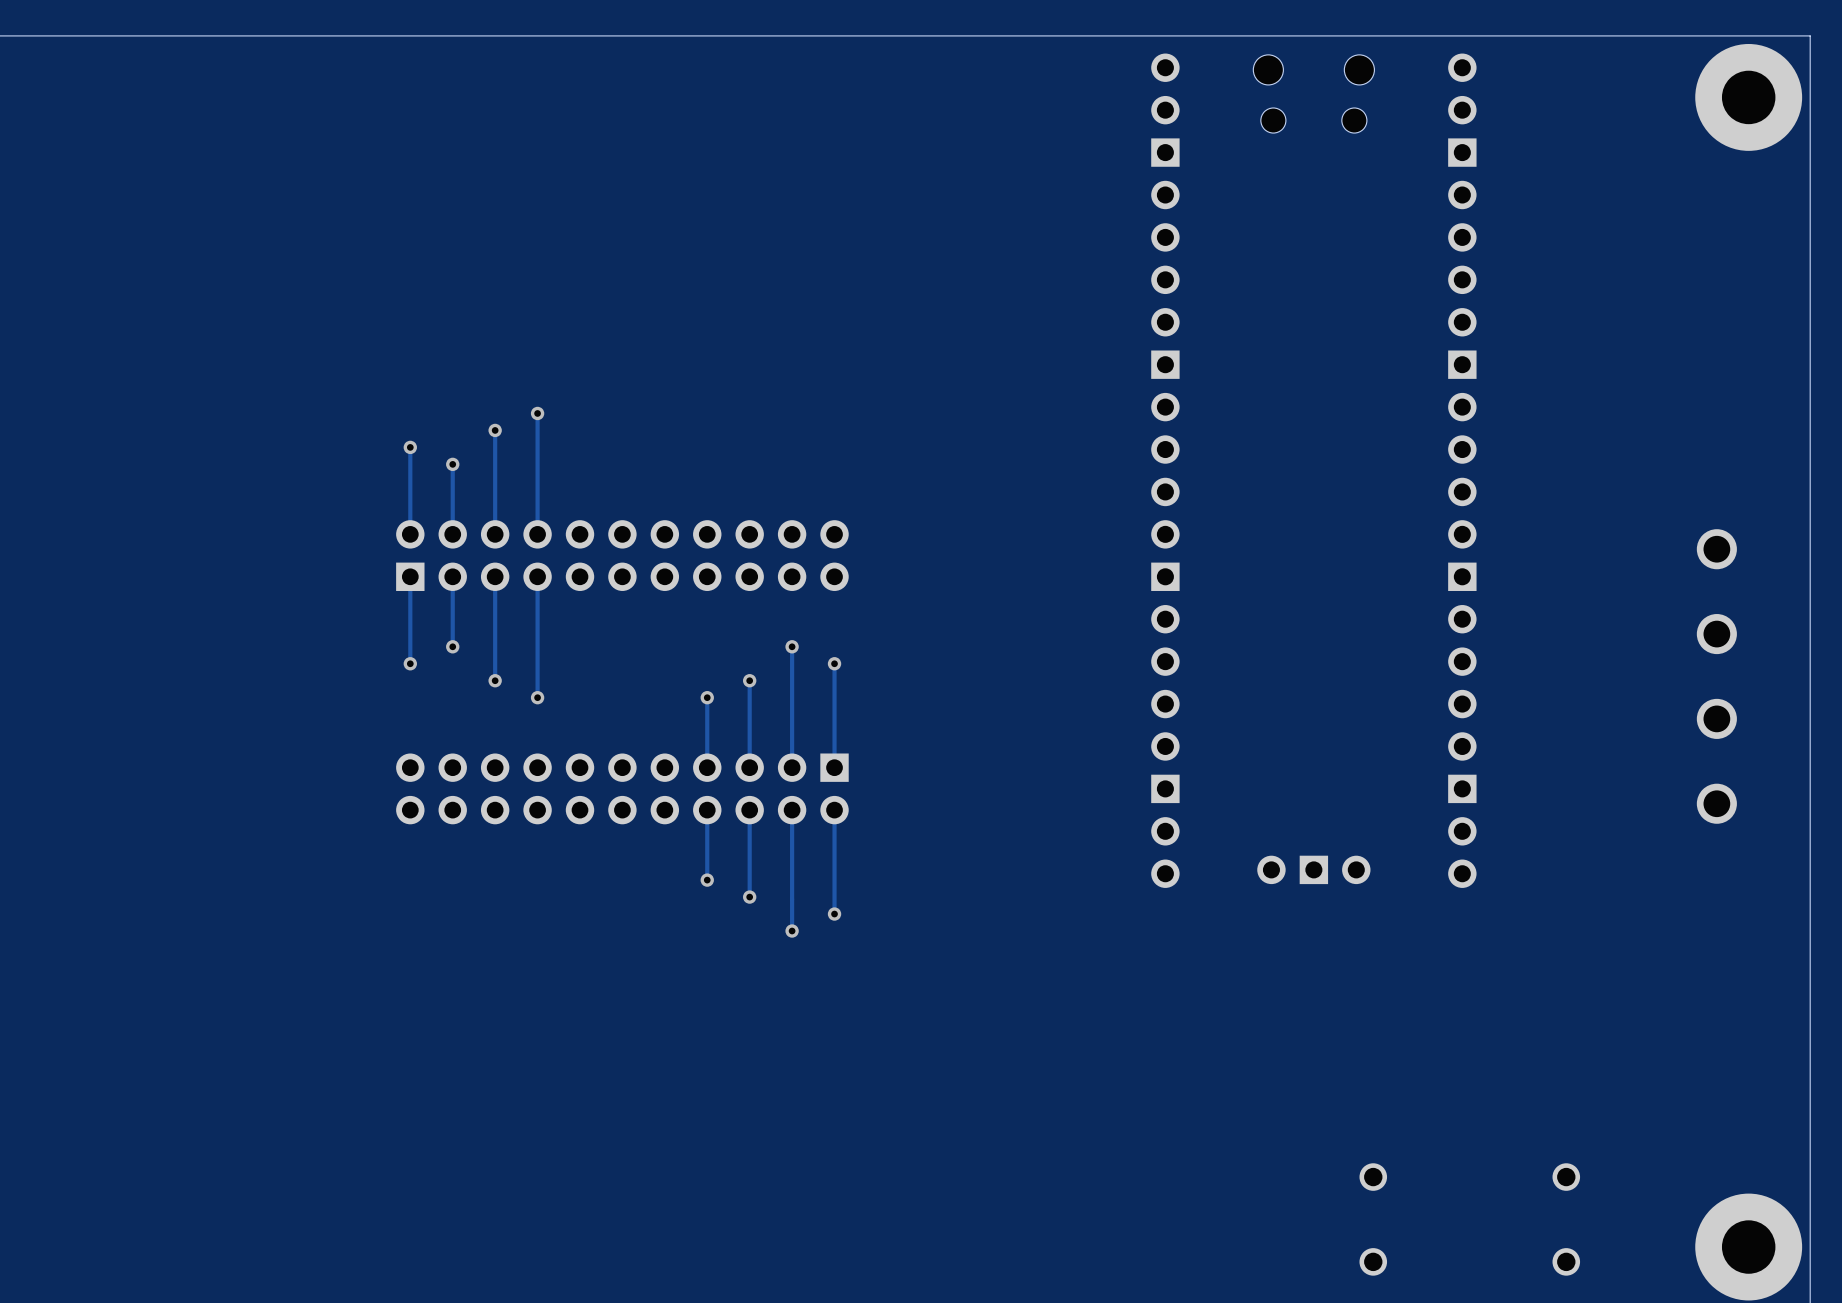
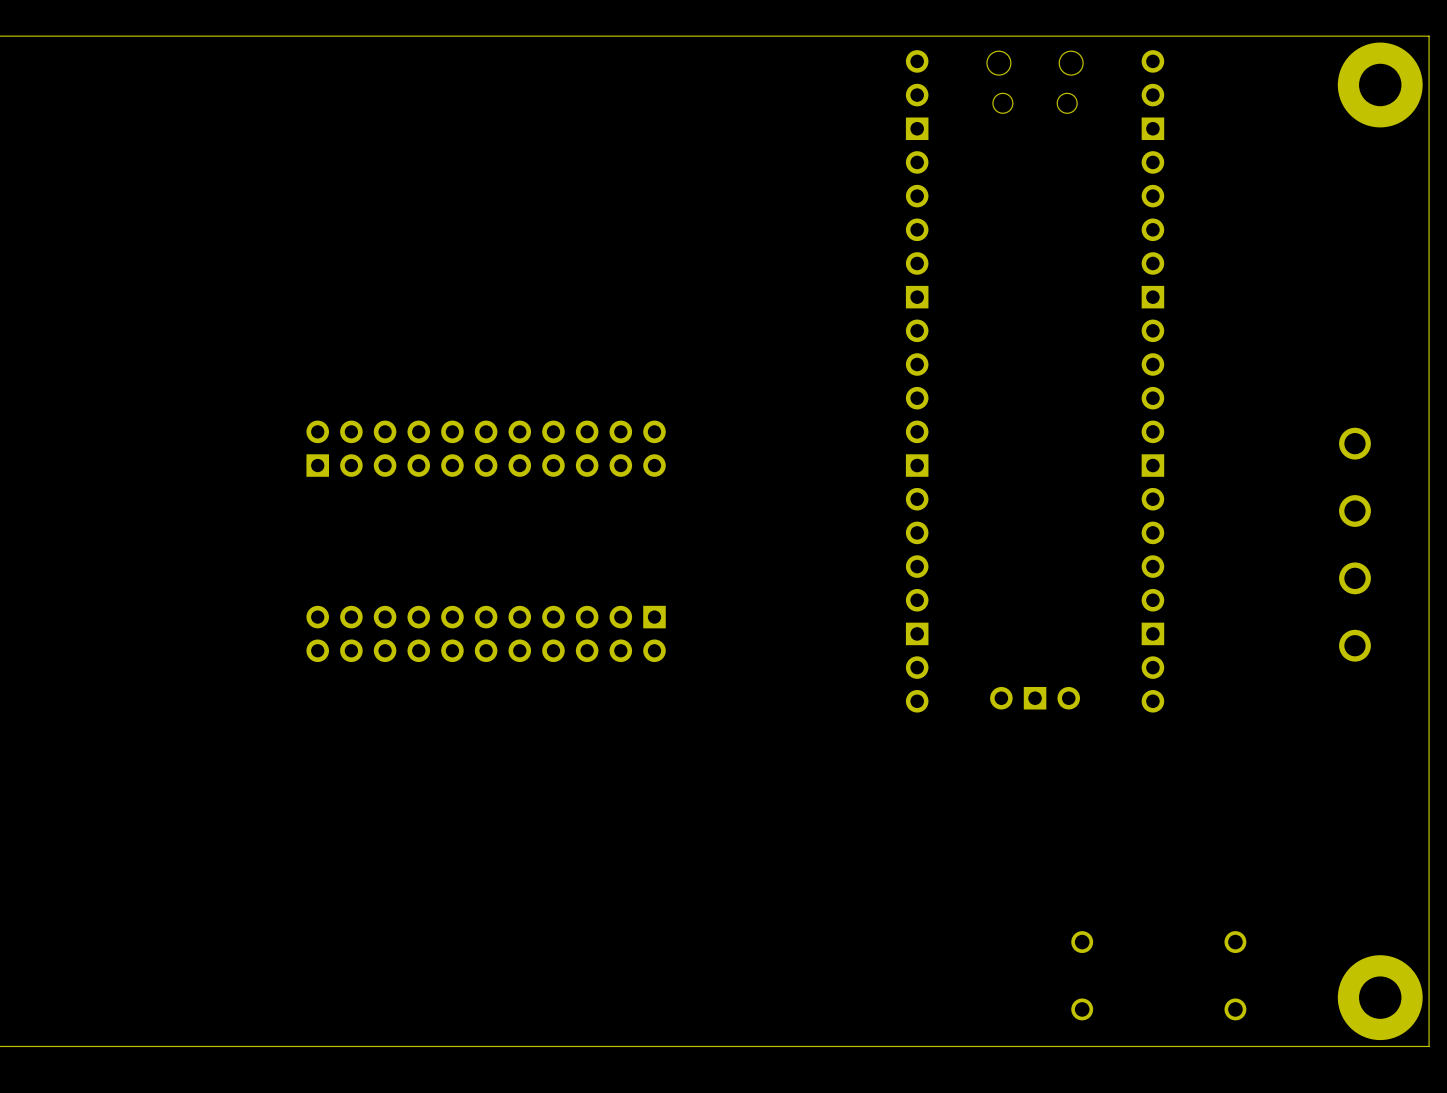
track: (537, 413) (537, 534) -> none
via: (537, 413) -> none
track: (495, 430) (495, 534) -> none
via: (495, 430) -> none
track: (410, 447) (410, 534) -> none
via: (410, 447) -> none
track: (452, 464) (452, 534) -> none
via: (452, 464) -> none
track: (410, 576) (410, 663) -> none
track: (452, 576) (452, 646) -> none
track: (495, 576) (495, 680) -> none
track: (537, 576) (537, 697) -> none
via: (452, 646) -> none
track: (792, 646) (792, 767) -> none
via: (792, 646) -> none
via: (410, 663) -> none
track: (834, 663) (834, 767) -> none
via: (834, 663) -> none
via: (495, 680) -> none
track: (749, 680) (749, 767) -> none
via: (749, 680) -> none
via: (537, 697) -> none
track: (707, 697) (707, 767) -> none
via: (707, 697) -> none
track: (707, 810) (707, 880) -> none
track: (749, 810) (749, 897) -> none
track: (792, 810) (792, 931) -> none
track: (834, 810) (834, 914) -> none
via: (707, 880) -> none
via: (749, 897) -> none
via: (834, 914) -> none
via: (792, 931) -> none

